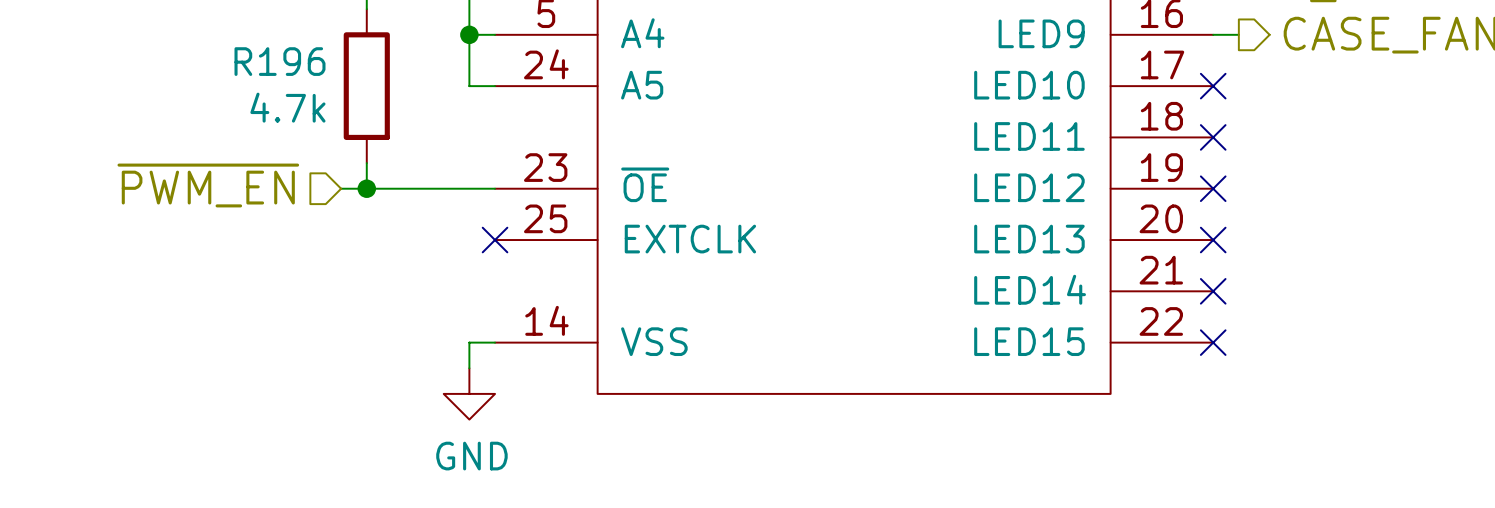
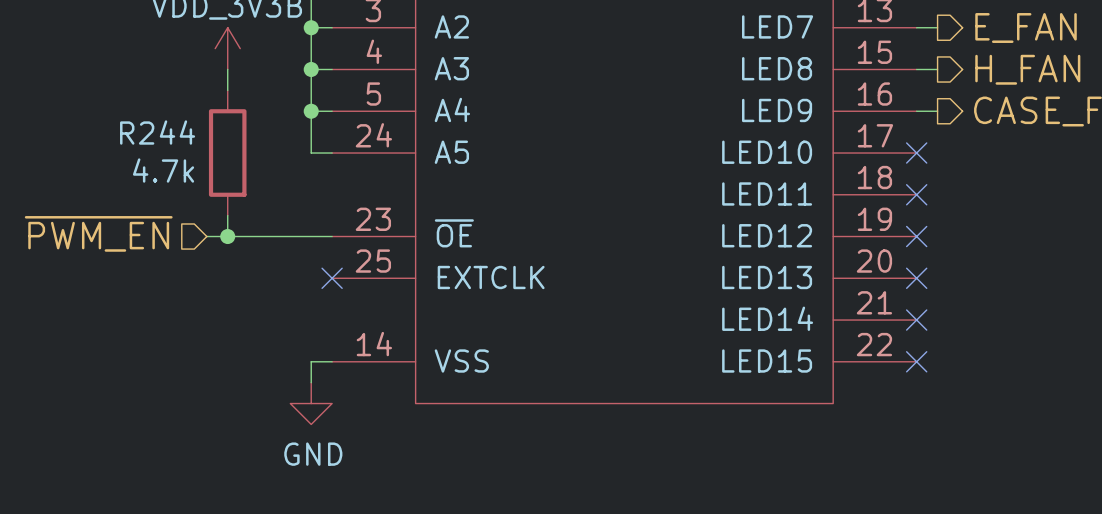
R196 name: R196 (280, 61) -> R244 (157, 132)

